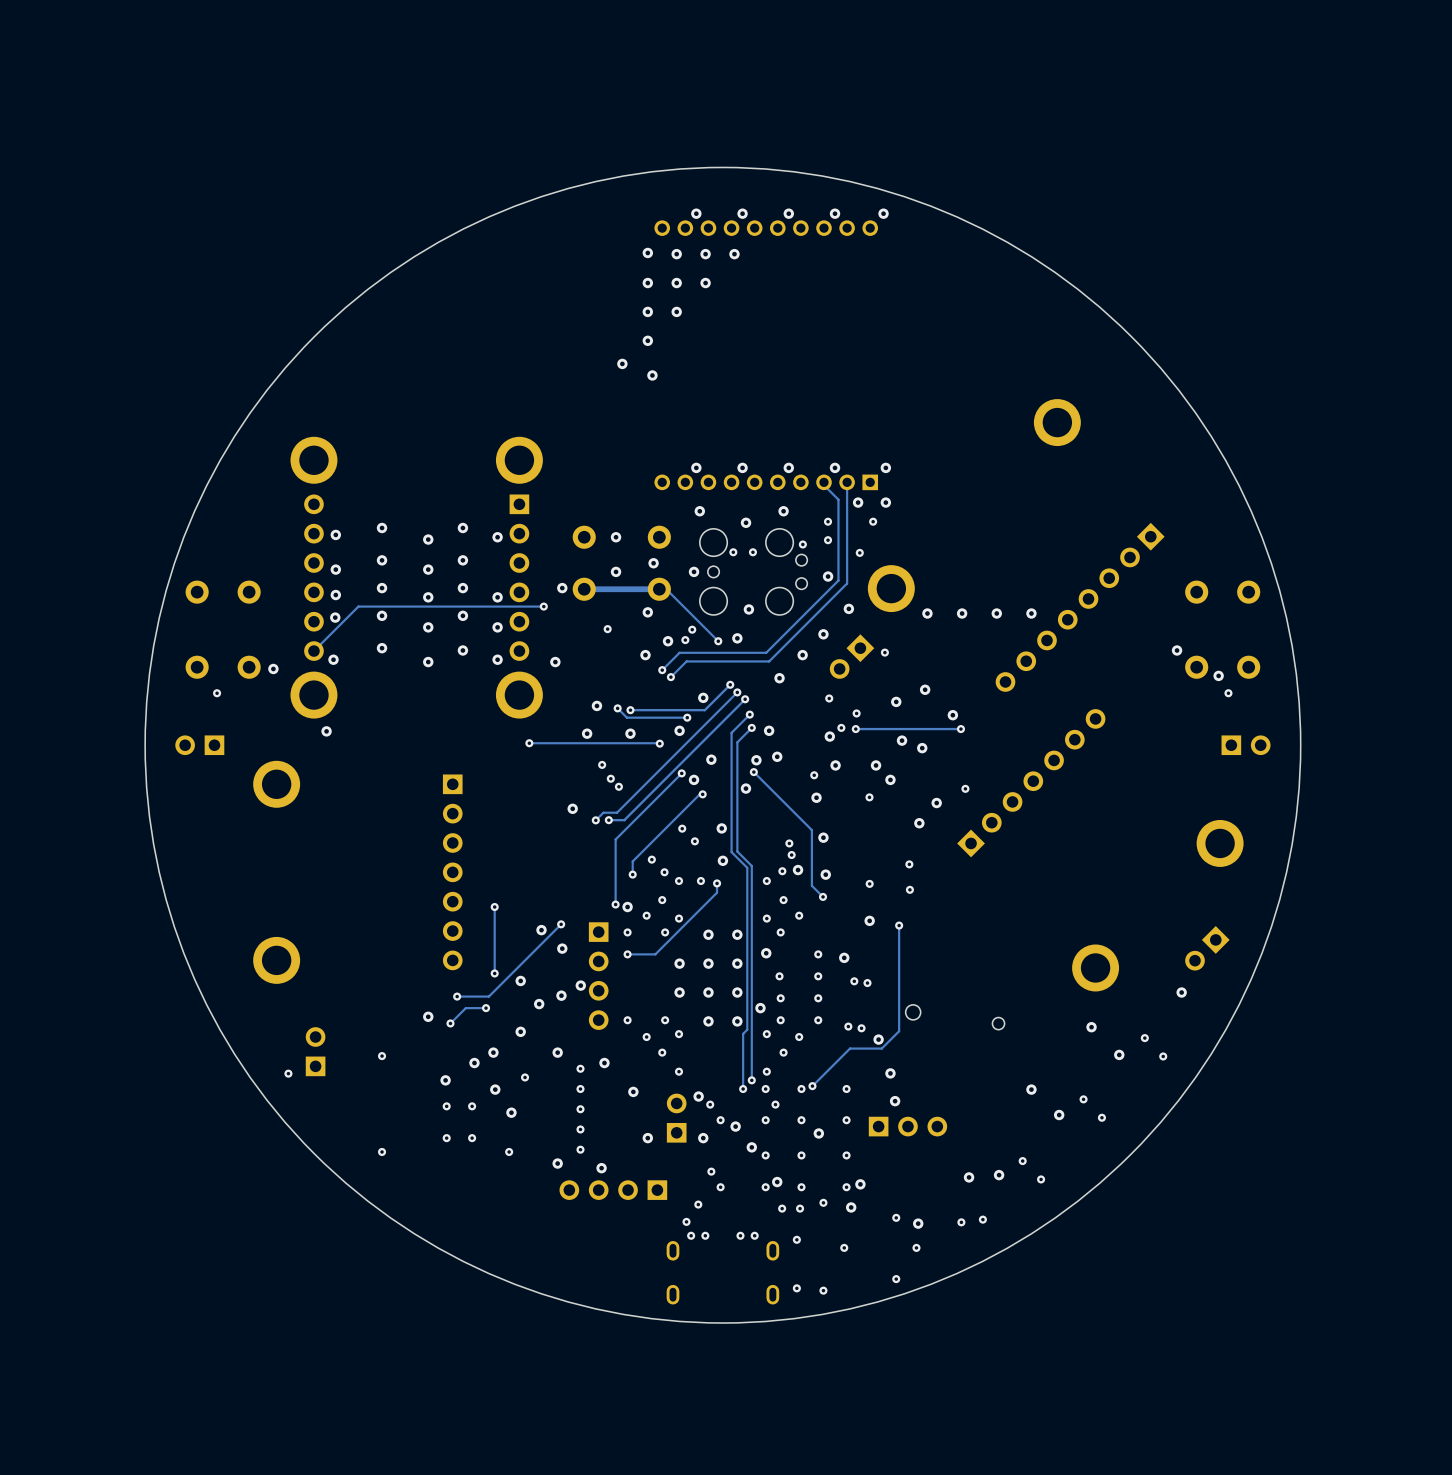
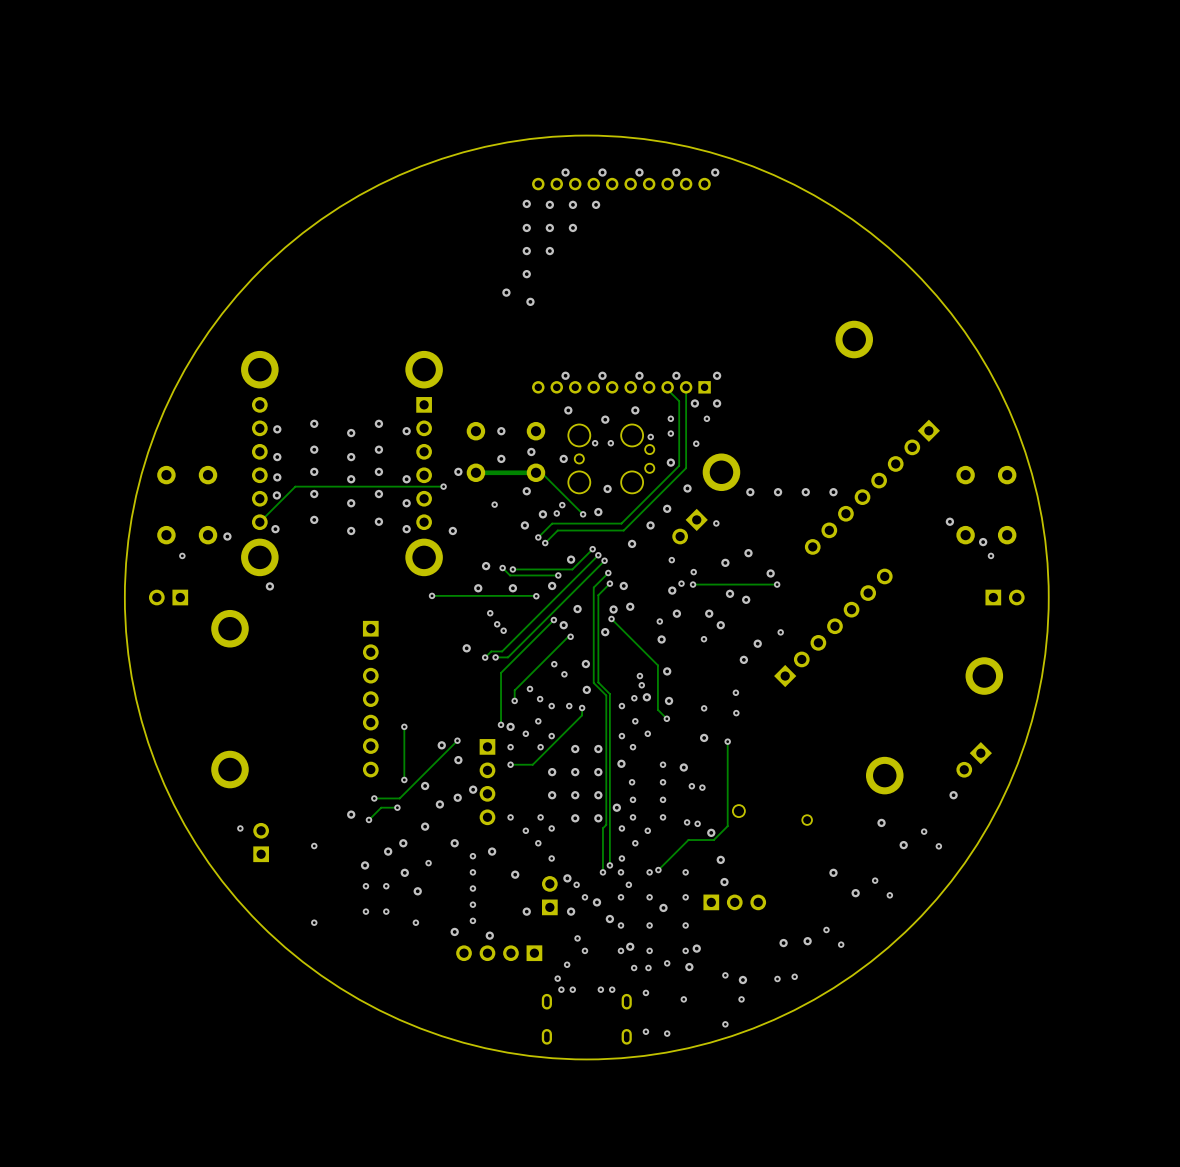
via position: (288, 1073) -> (240, 828)

